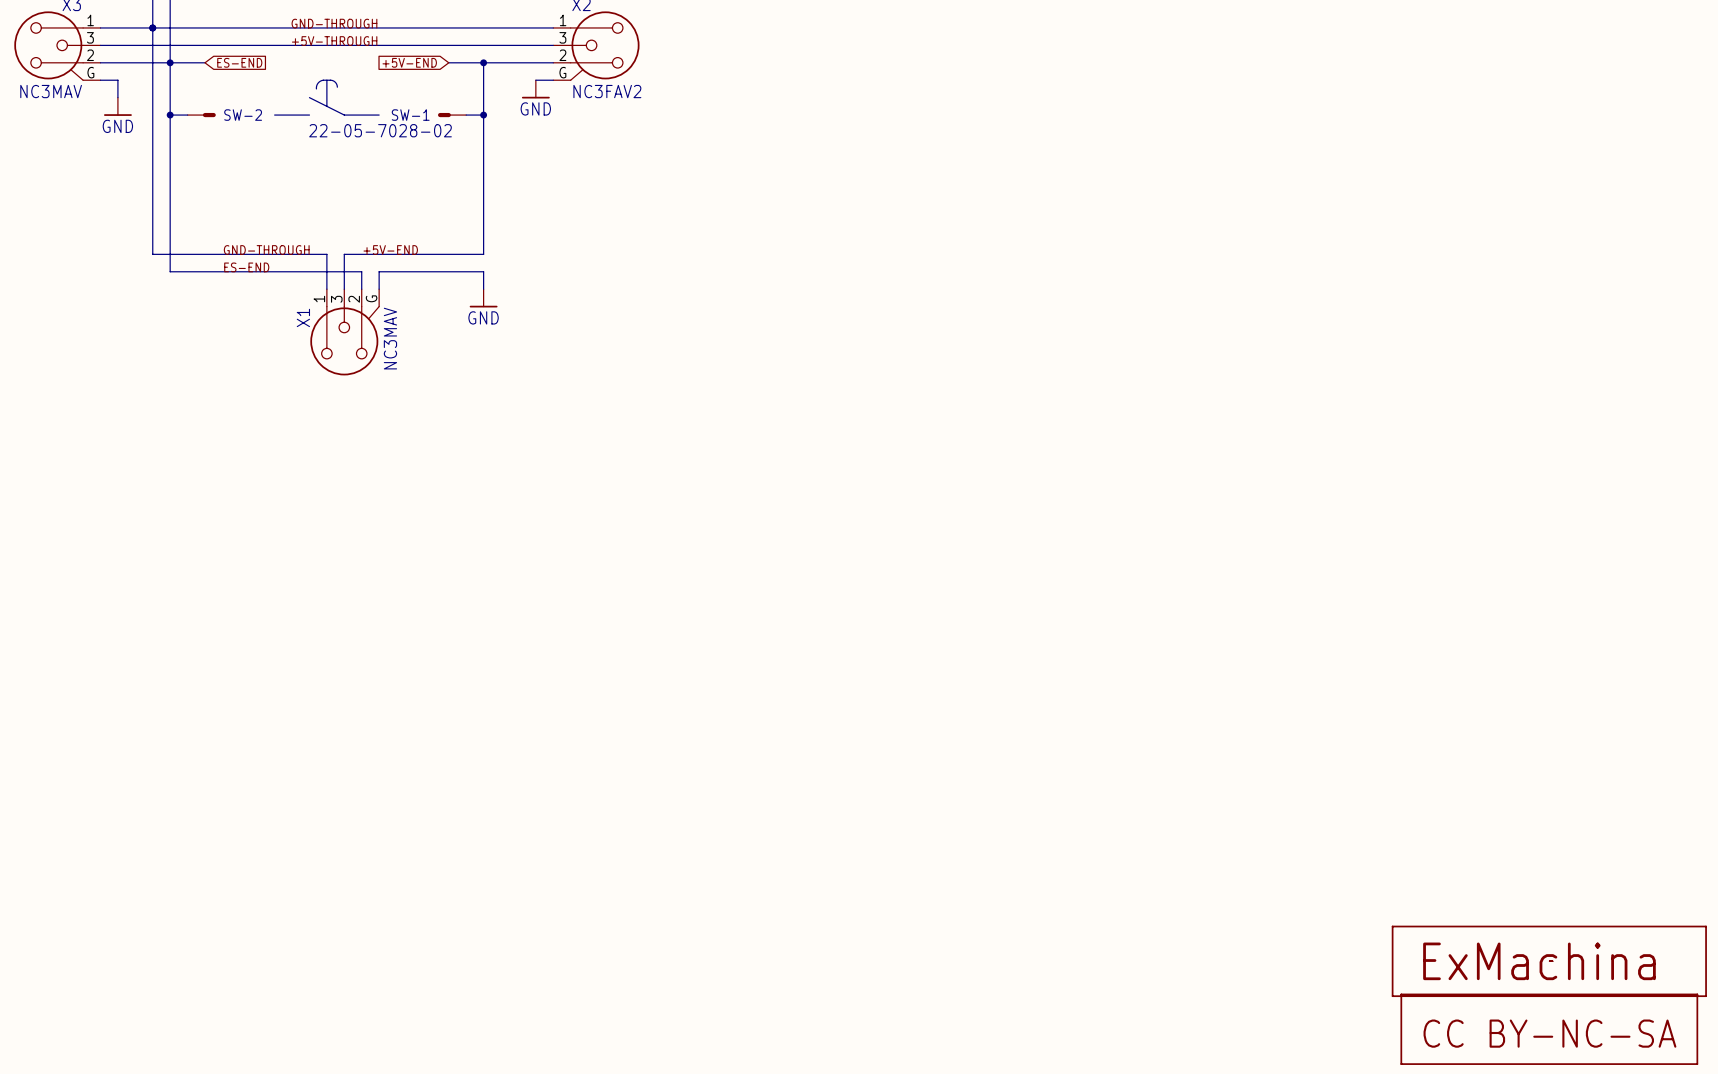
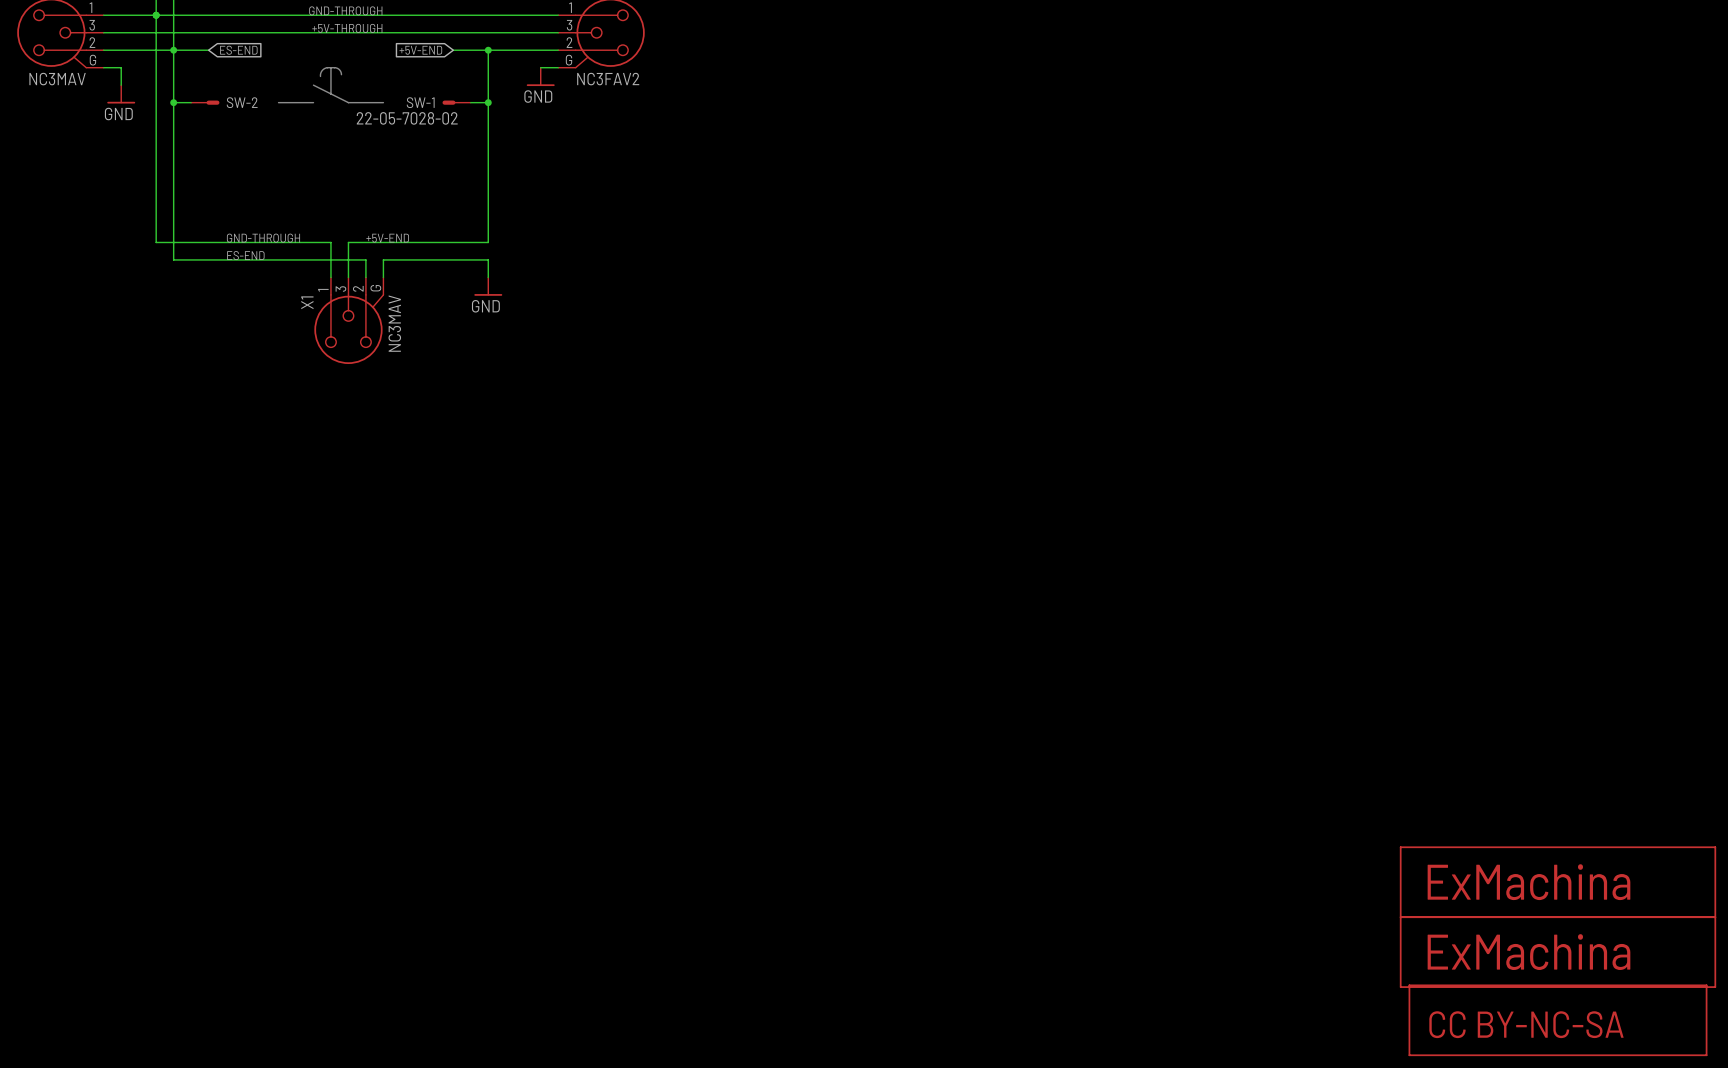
part: none -> (1558, 882)

